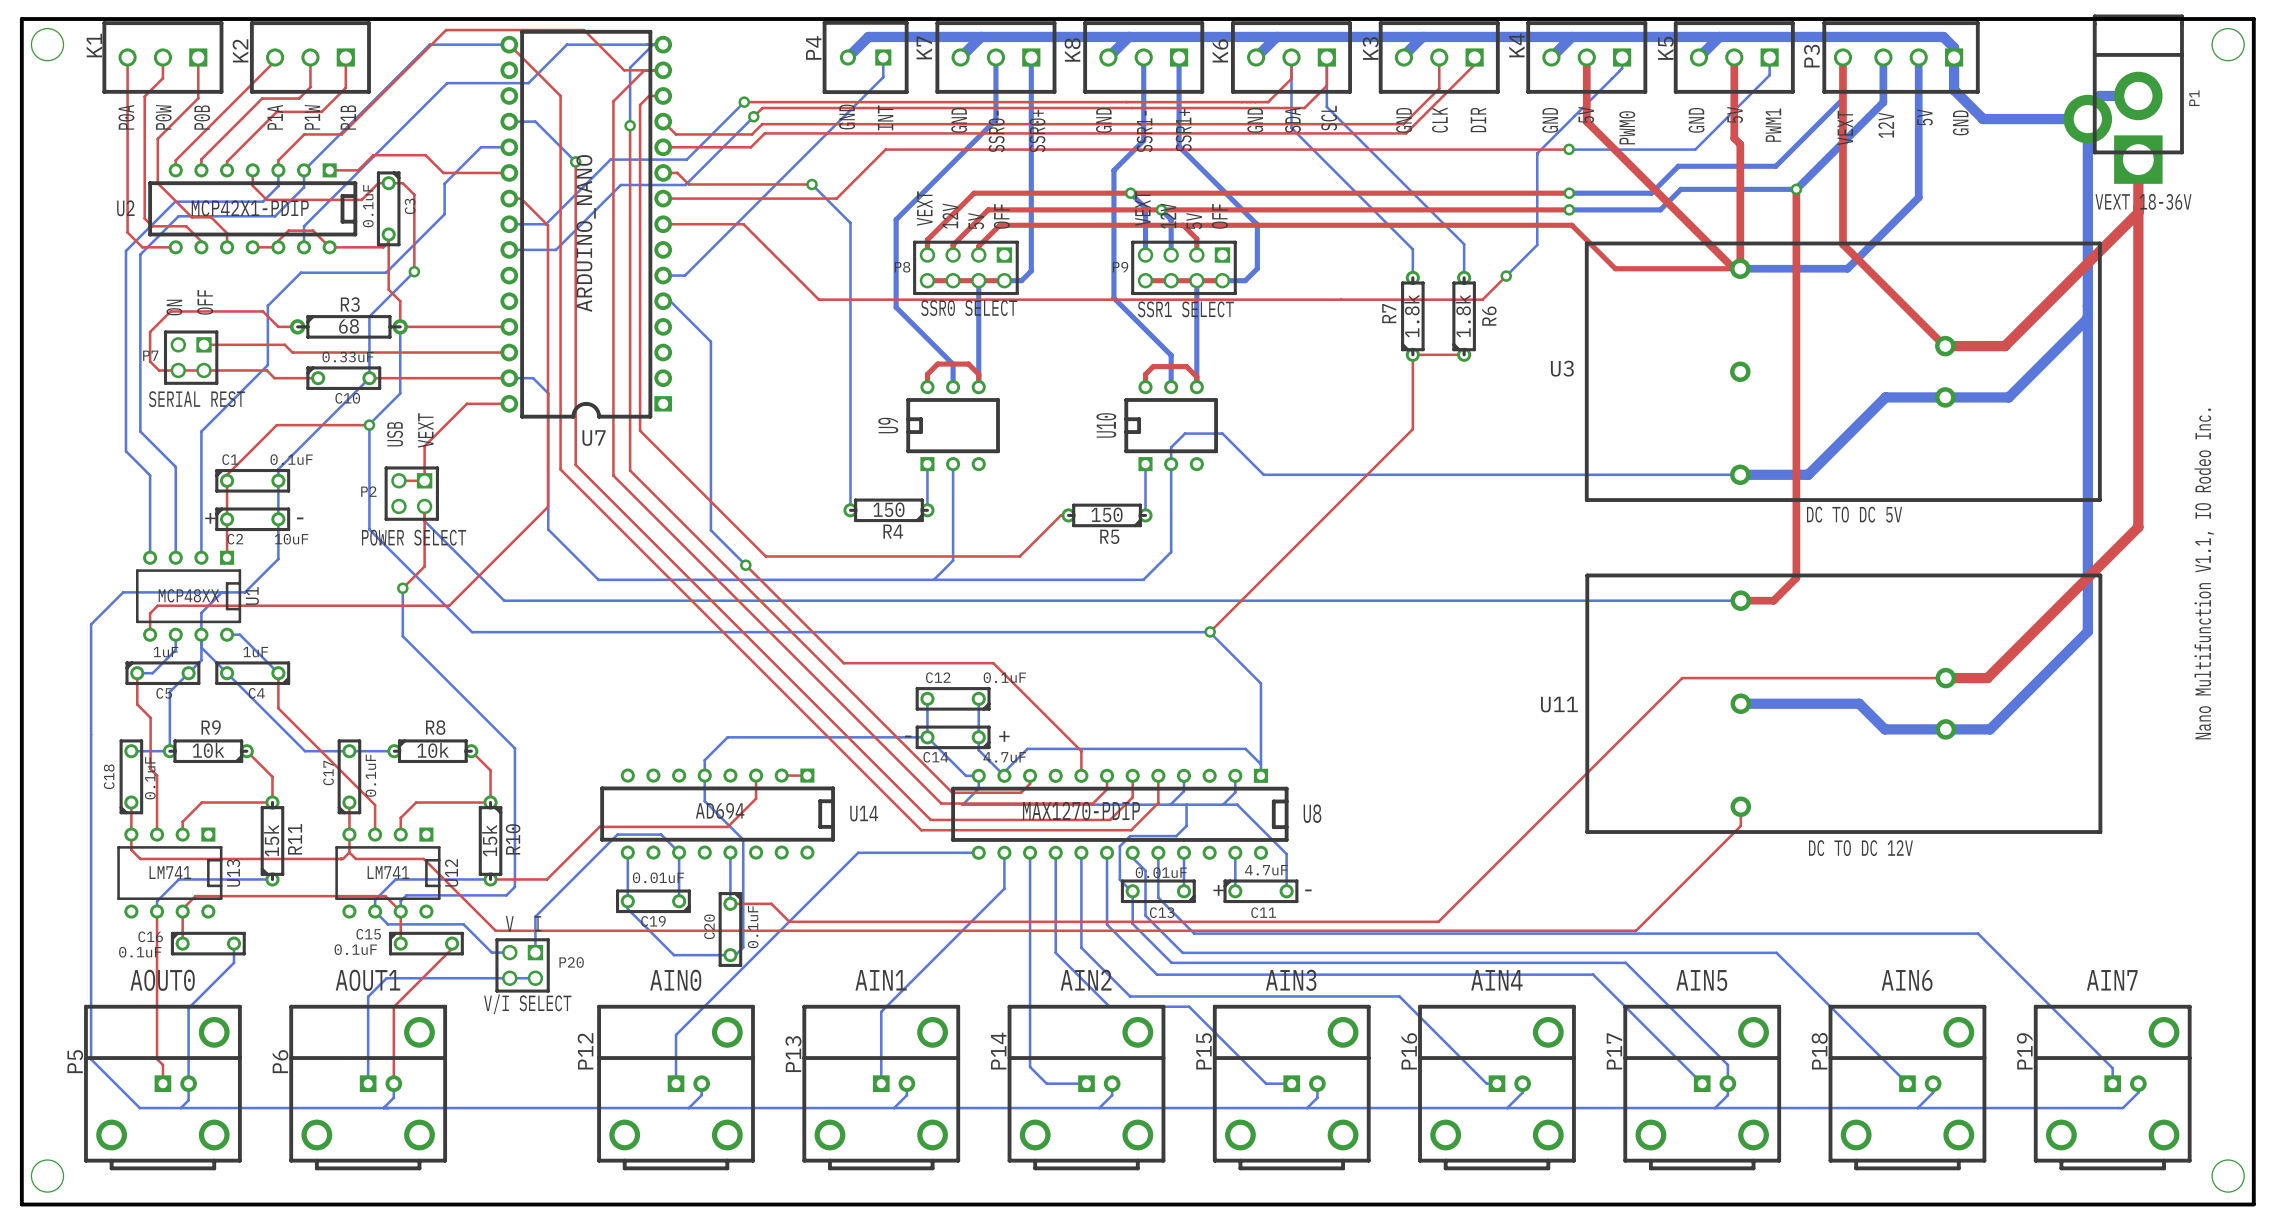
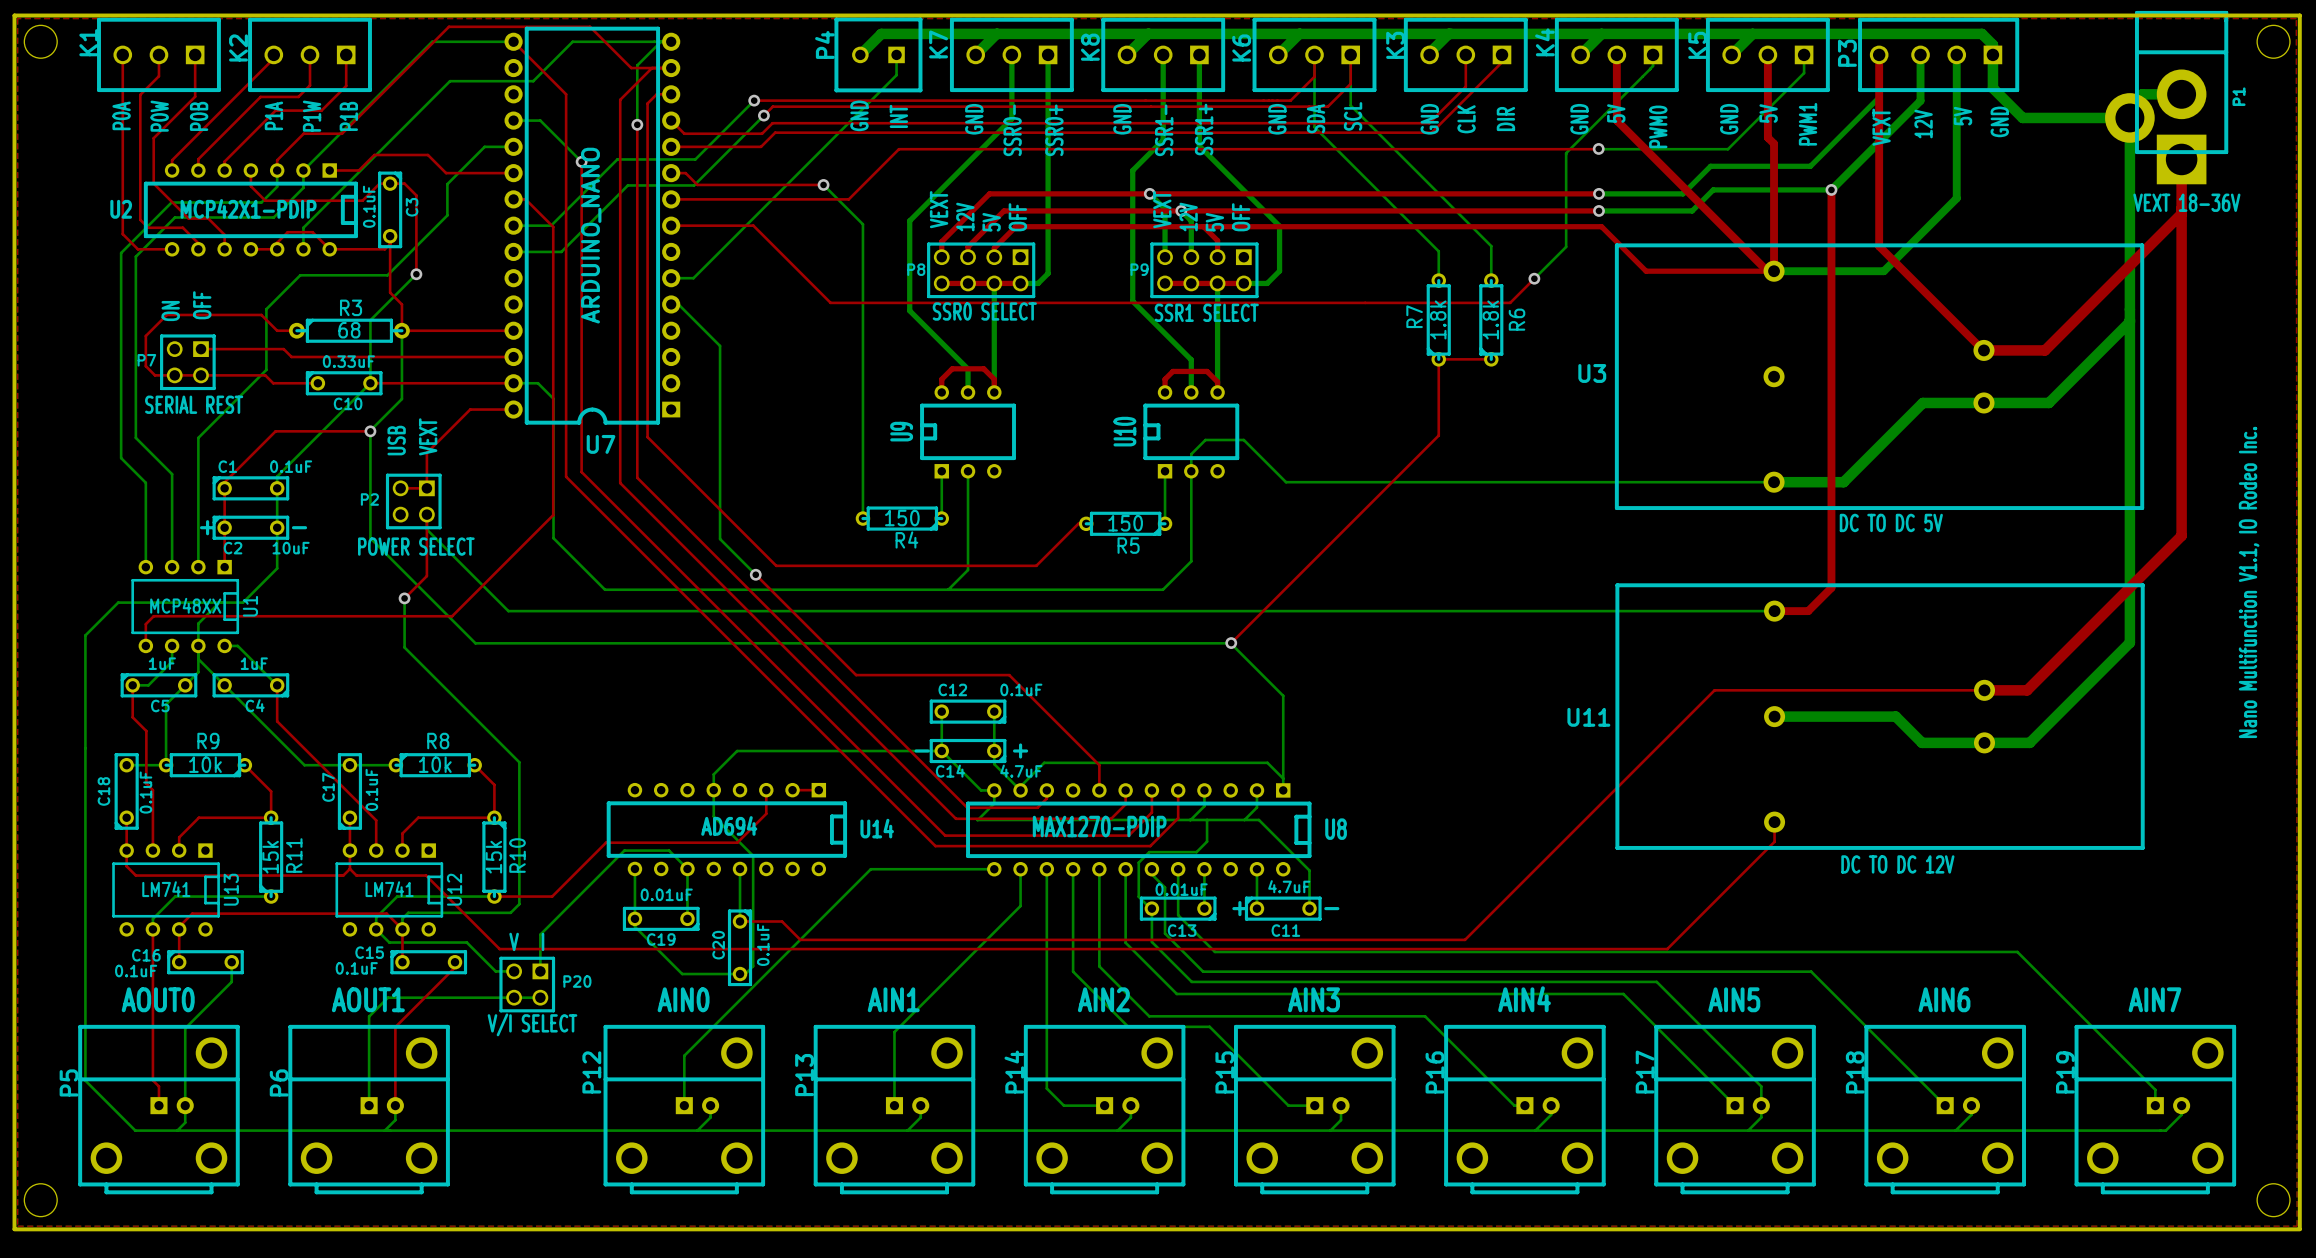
top zone outline: none -> (17, 18) (2296, 18) (2297, 1226) (17, 1226) (17, 18)

